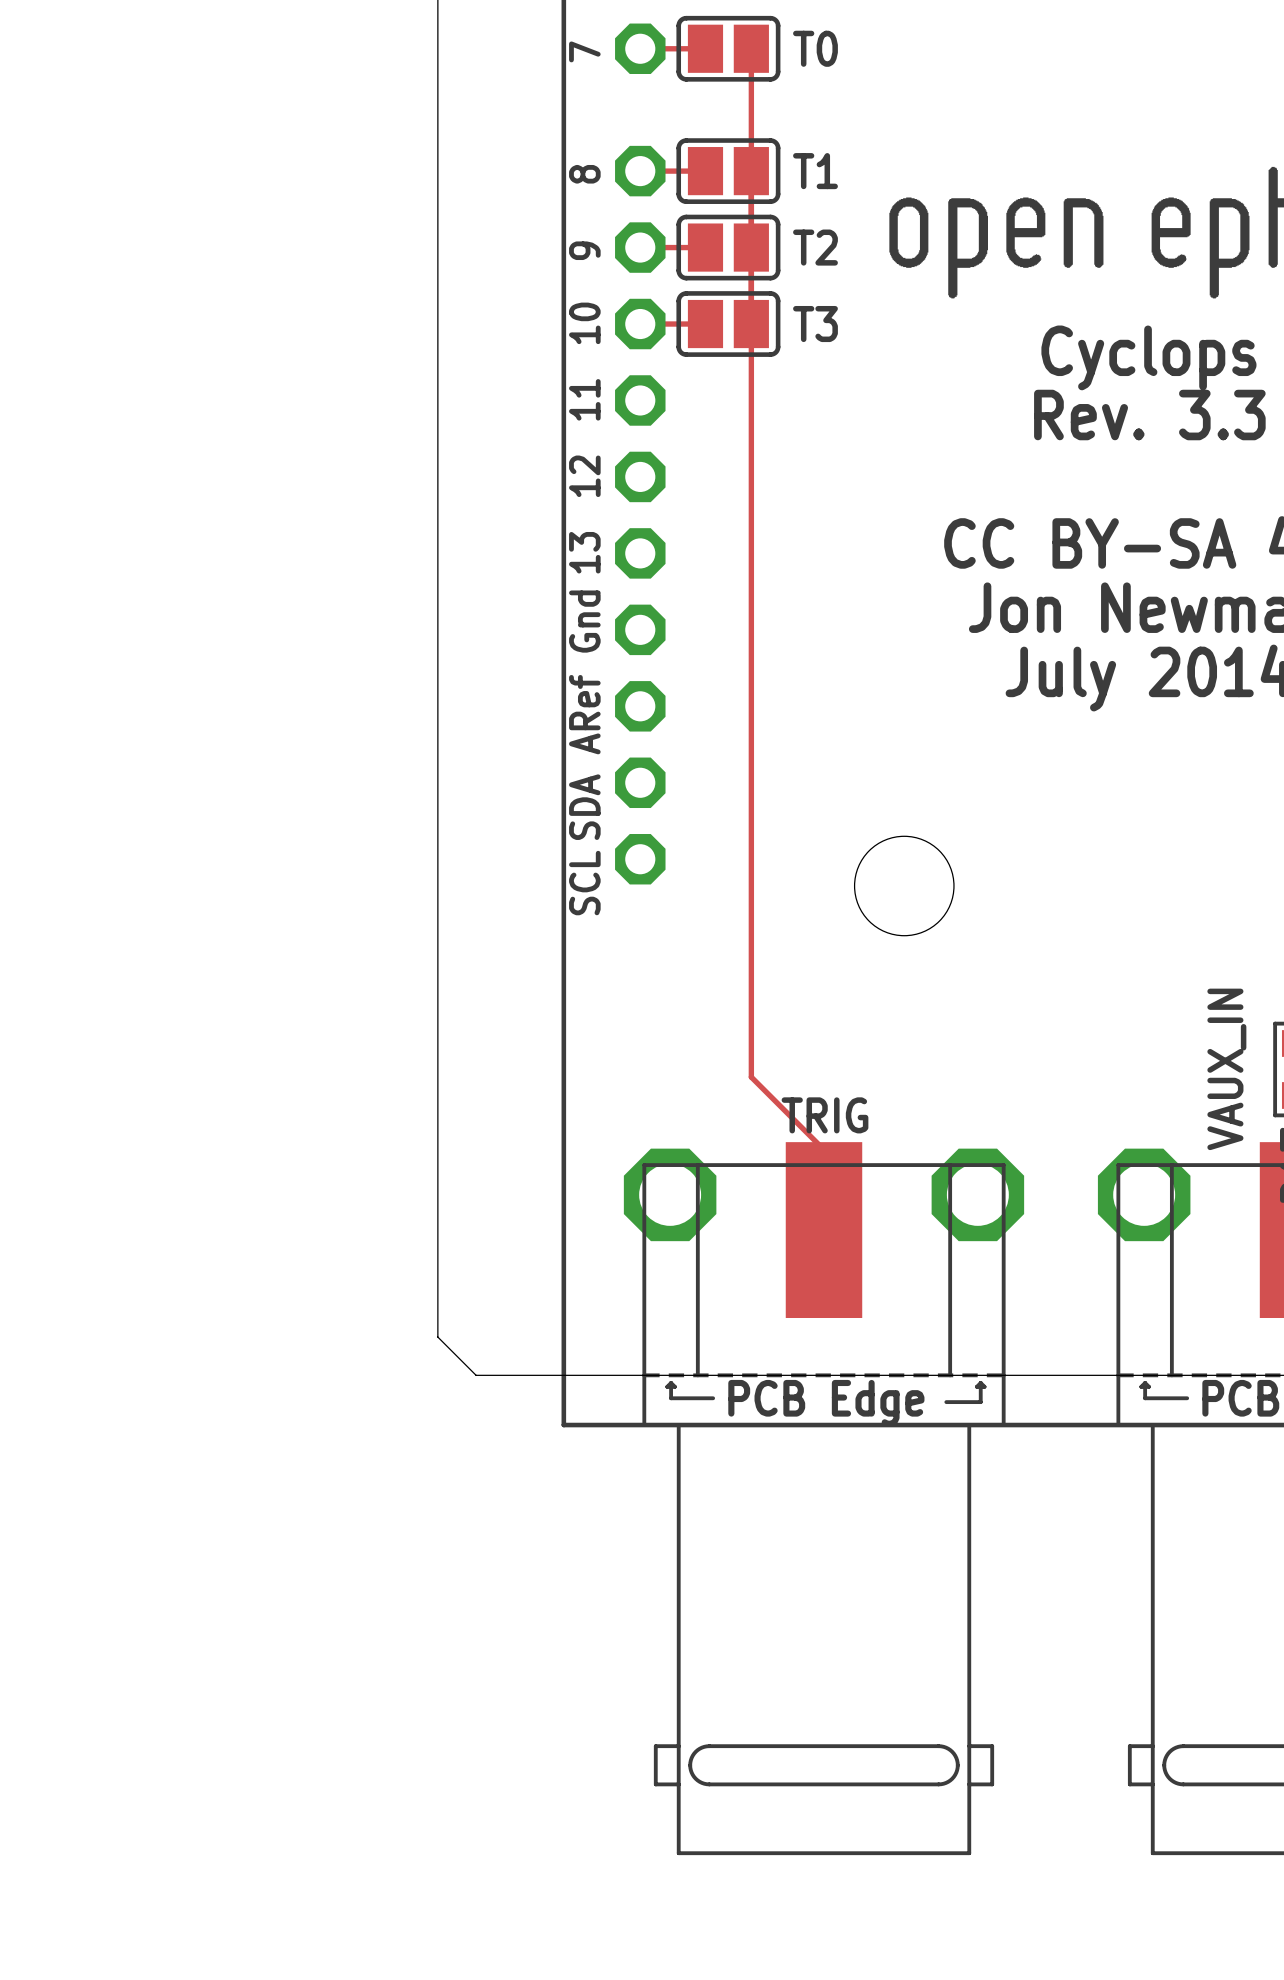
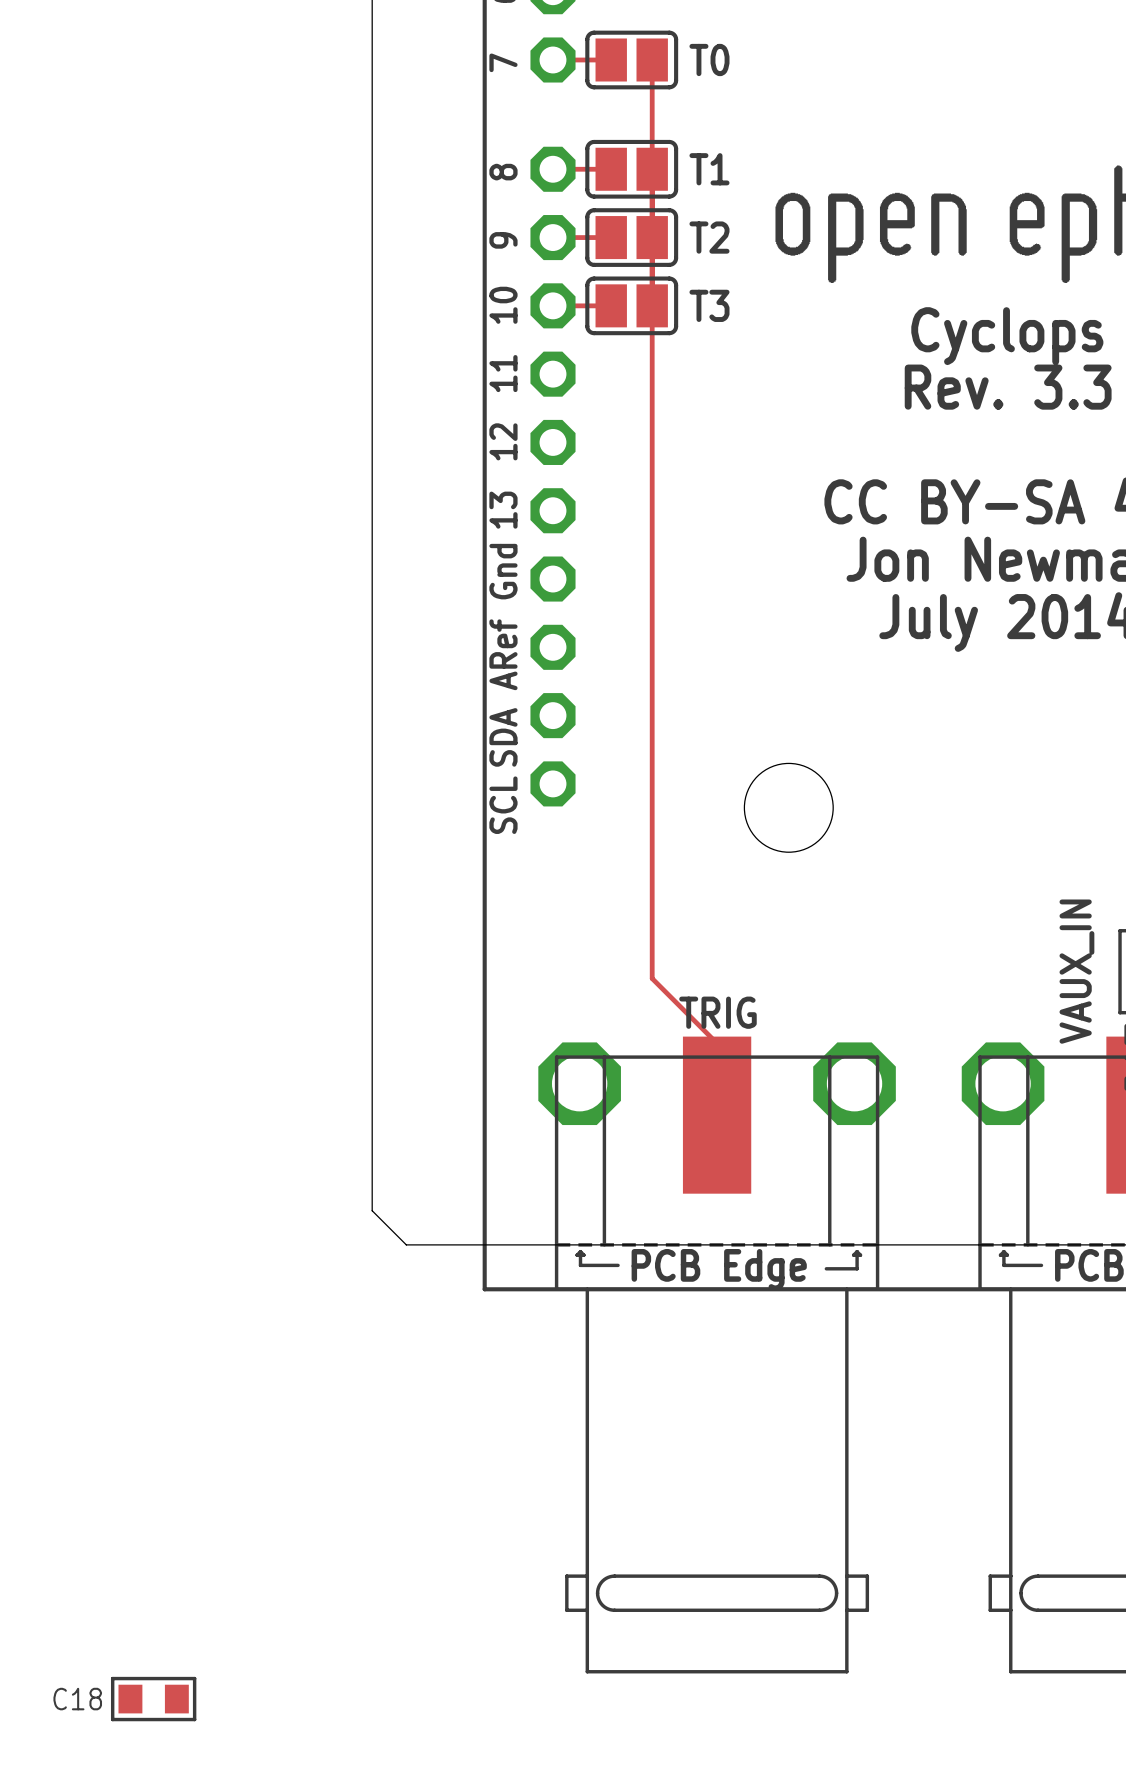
C18: none -> (153, 1699)

